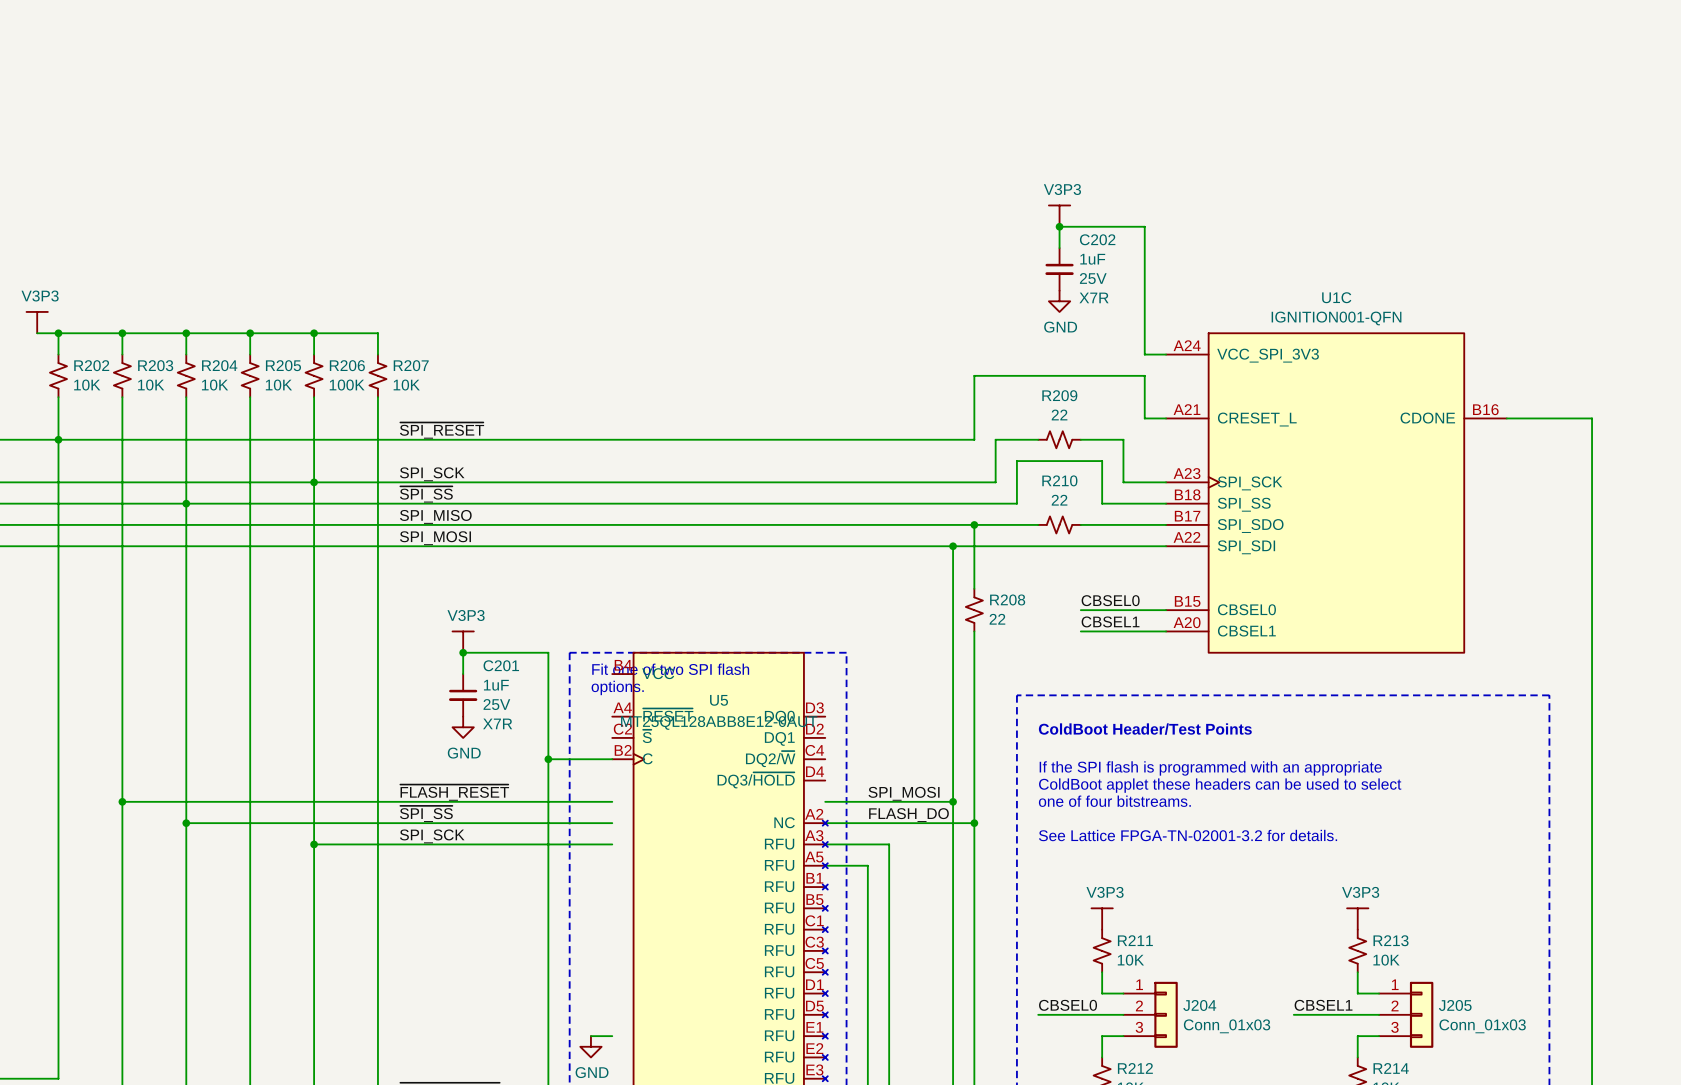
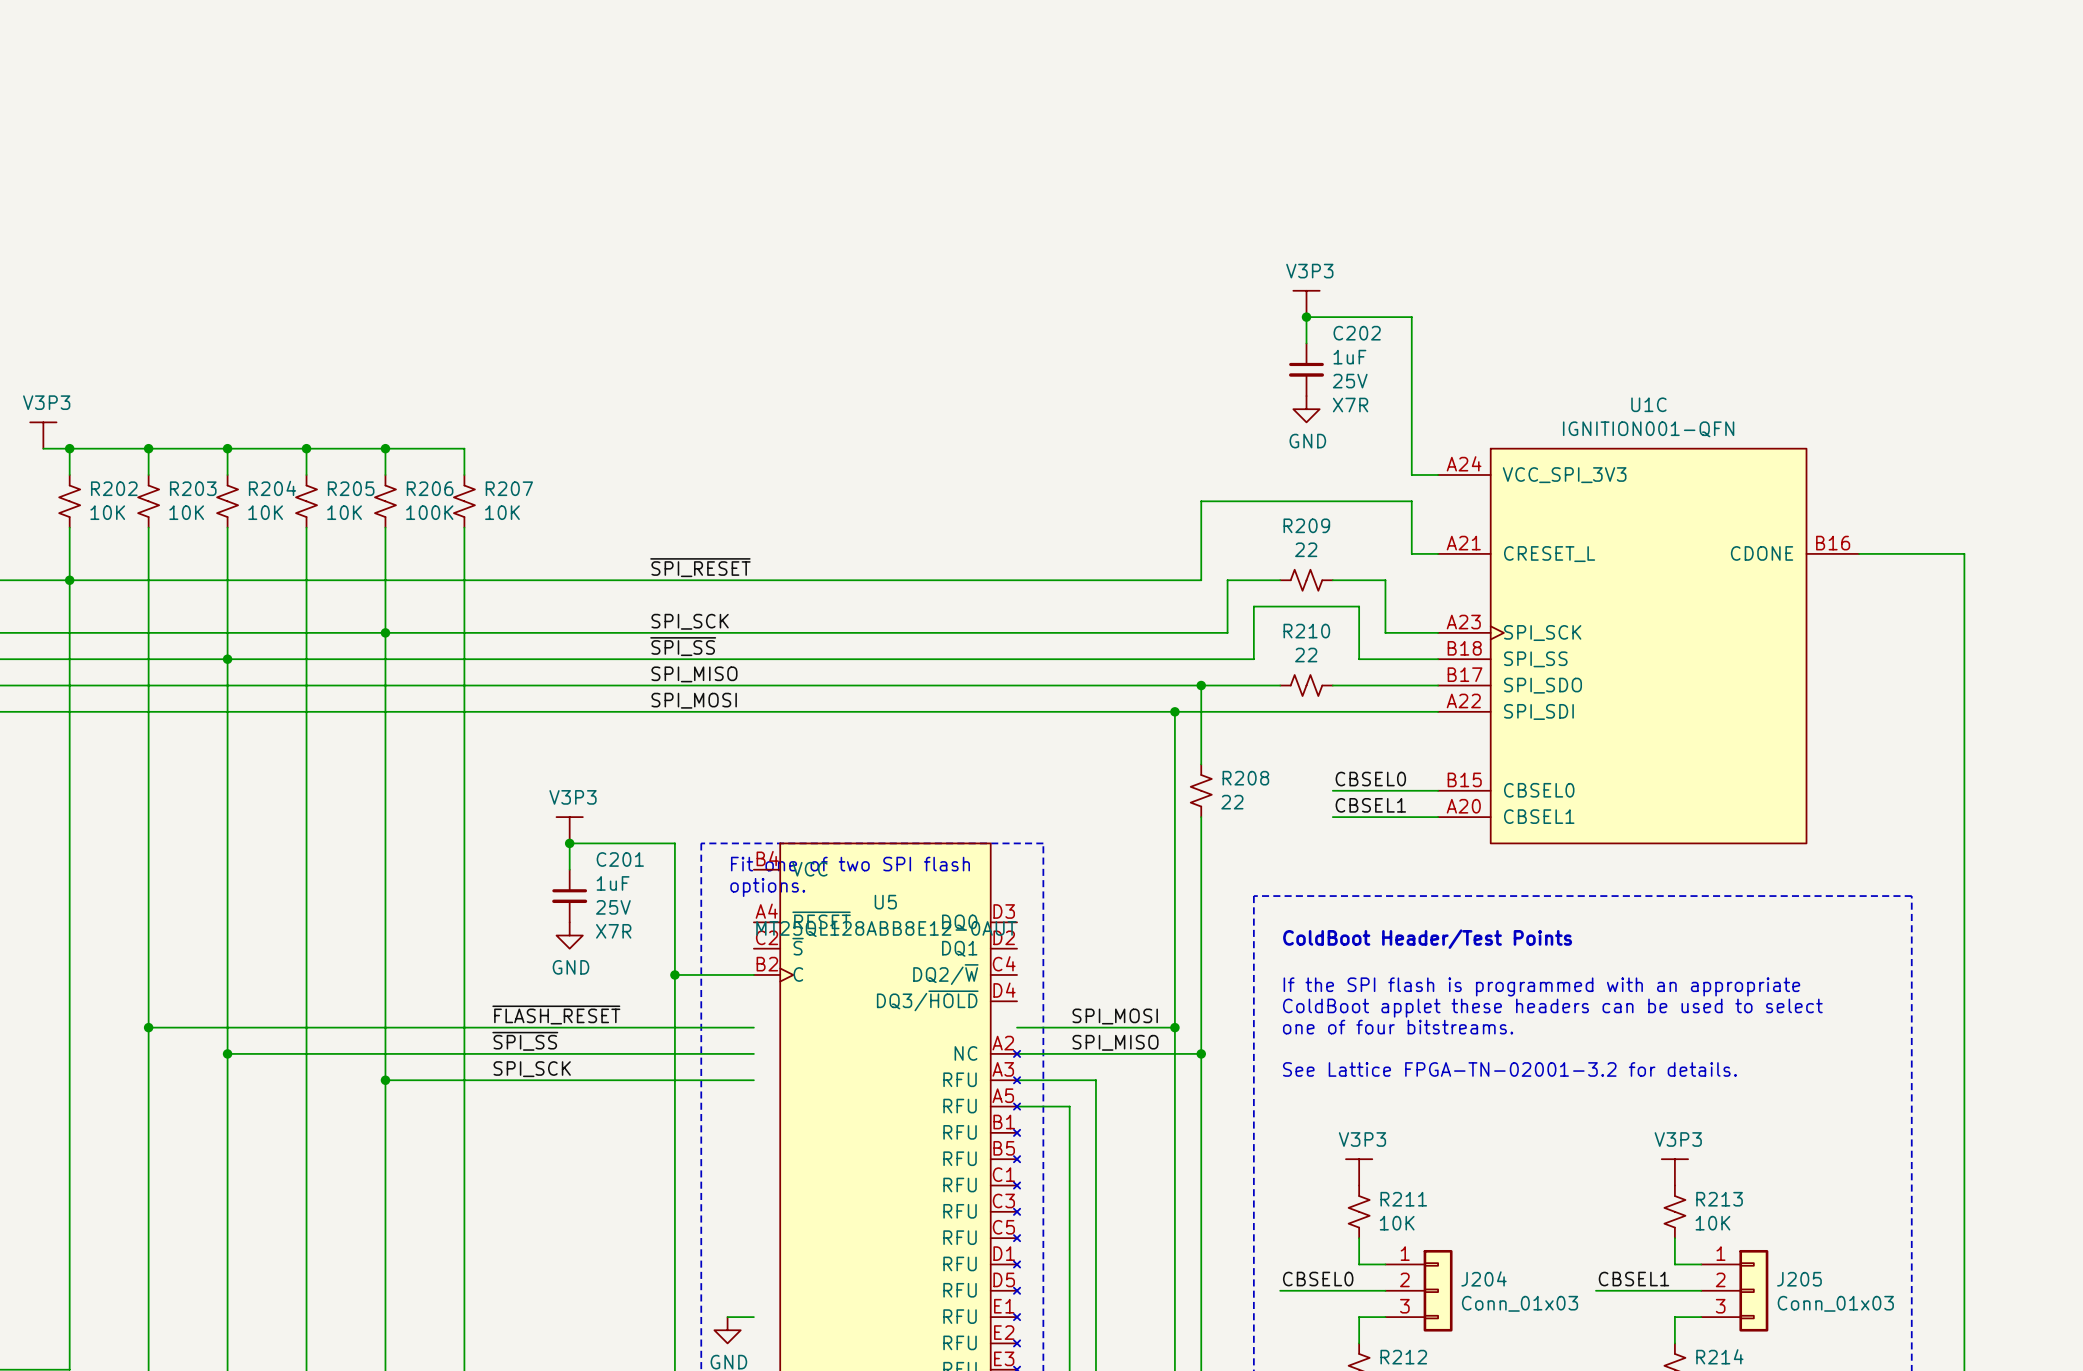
label position: ~{SPI_RESET} (442, 430) -> ~{SPI_RESET} (700, 567)
label position: SPI_SCK (432, 474) -> SPI_SCK (690, 621)
label position: ~{SPI_SS} (426, 494) -> ~{SPI_SS} (683, 646)
label position: SPI_MISO (435, 516) -> SPI_MISO (694, 674)
label position: SPI_MOSI (435, 538) -> SPI_MOSI (694, 700)
label: FLASH_DO (908, 815) -> SPI_MISO (1115, 1042)

